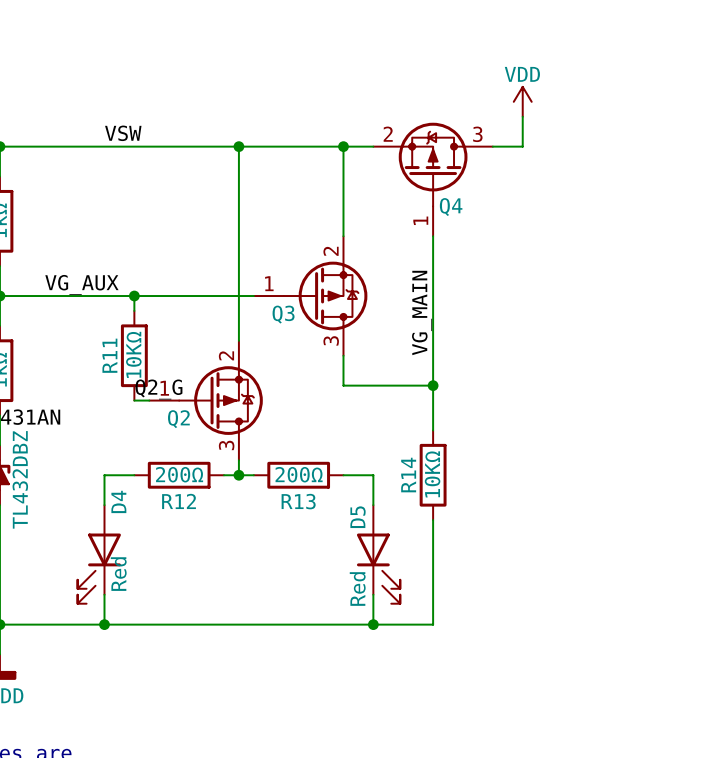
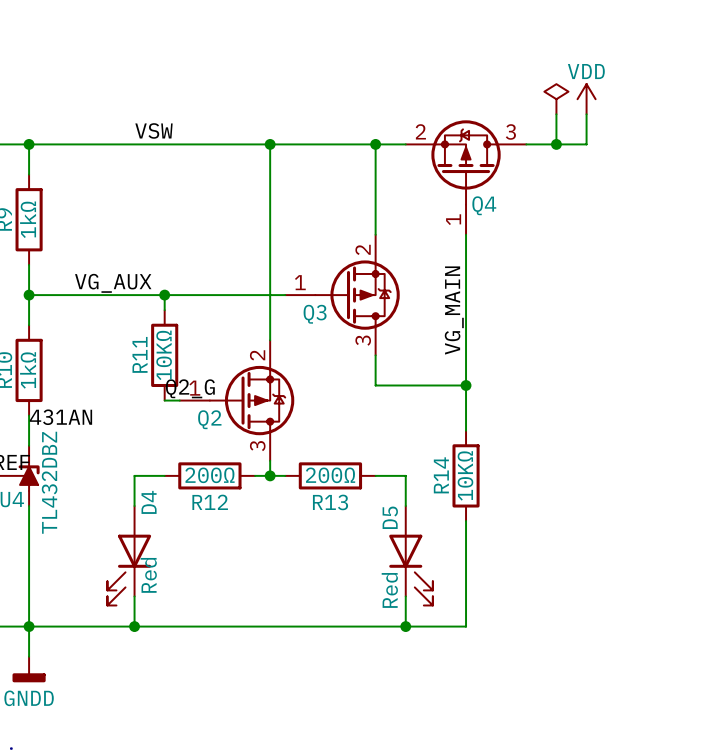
power symbol text: VDD (522, 74) -> none
power symbol shape: [513, 86, 532, 117] -> [544, 84, 569, 115]
power symbol: none -> VDD (586, 99)
wire: none -> (586, 114) (586, 144) (556, 144)
junction: none -> (556, 144)

